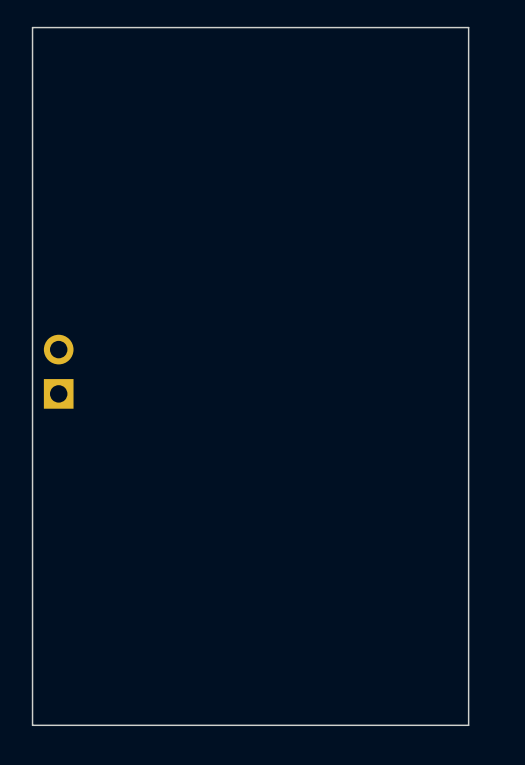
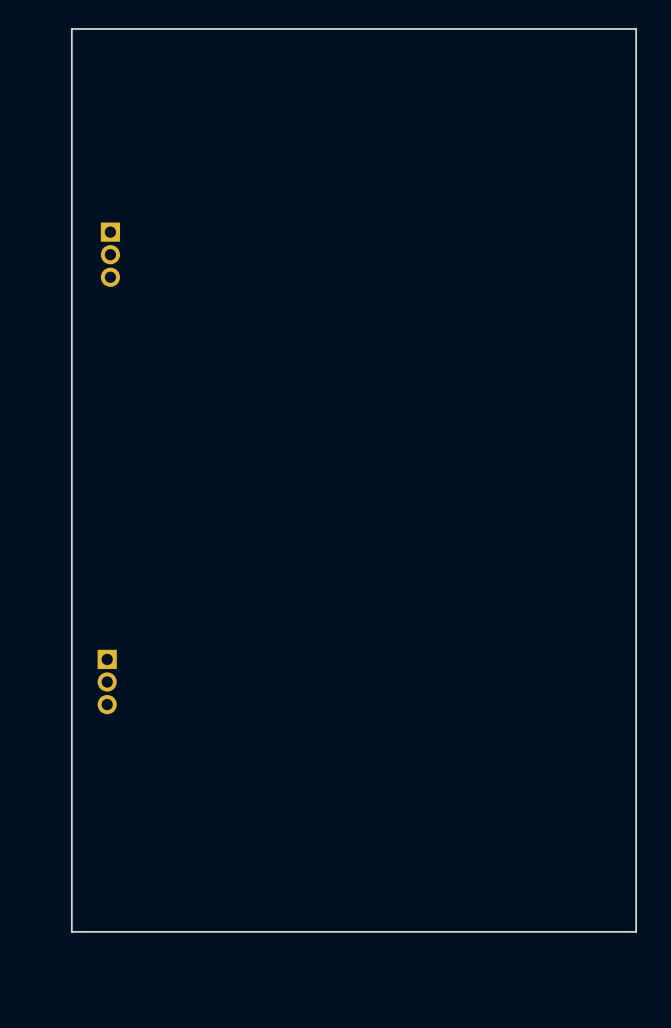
part: none -> (110, 254)
part: (58, 371) -> none
part: none -> (107, 681)

